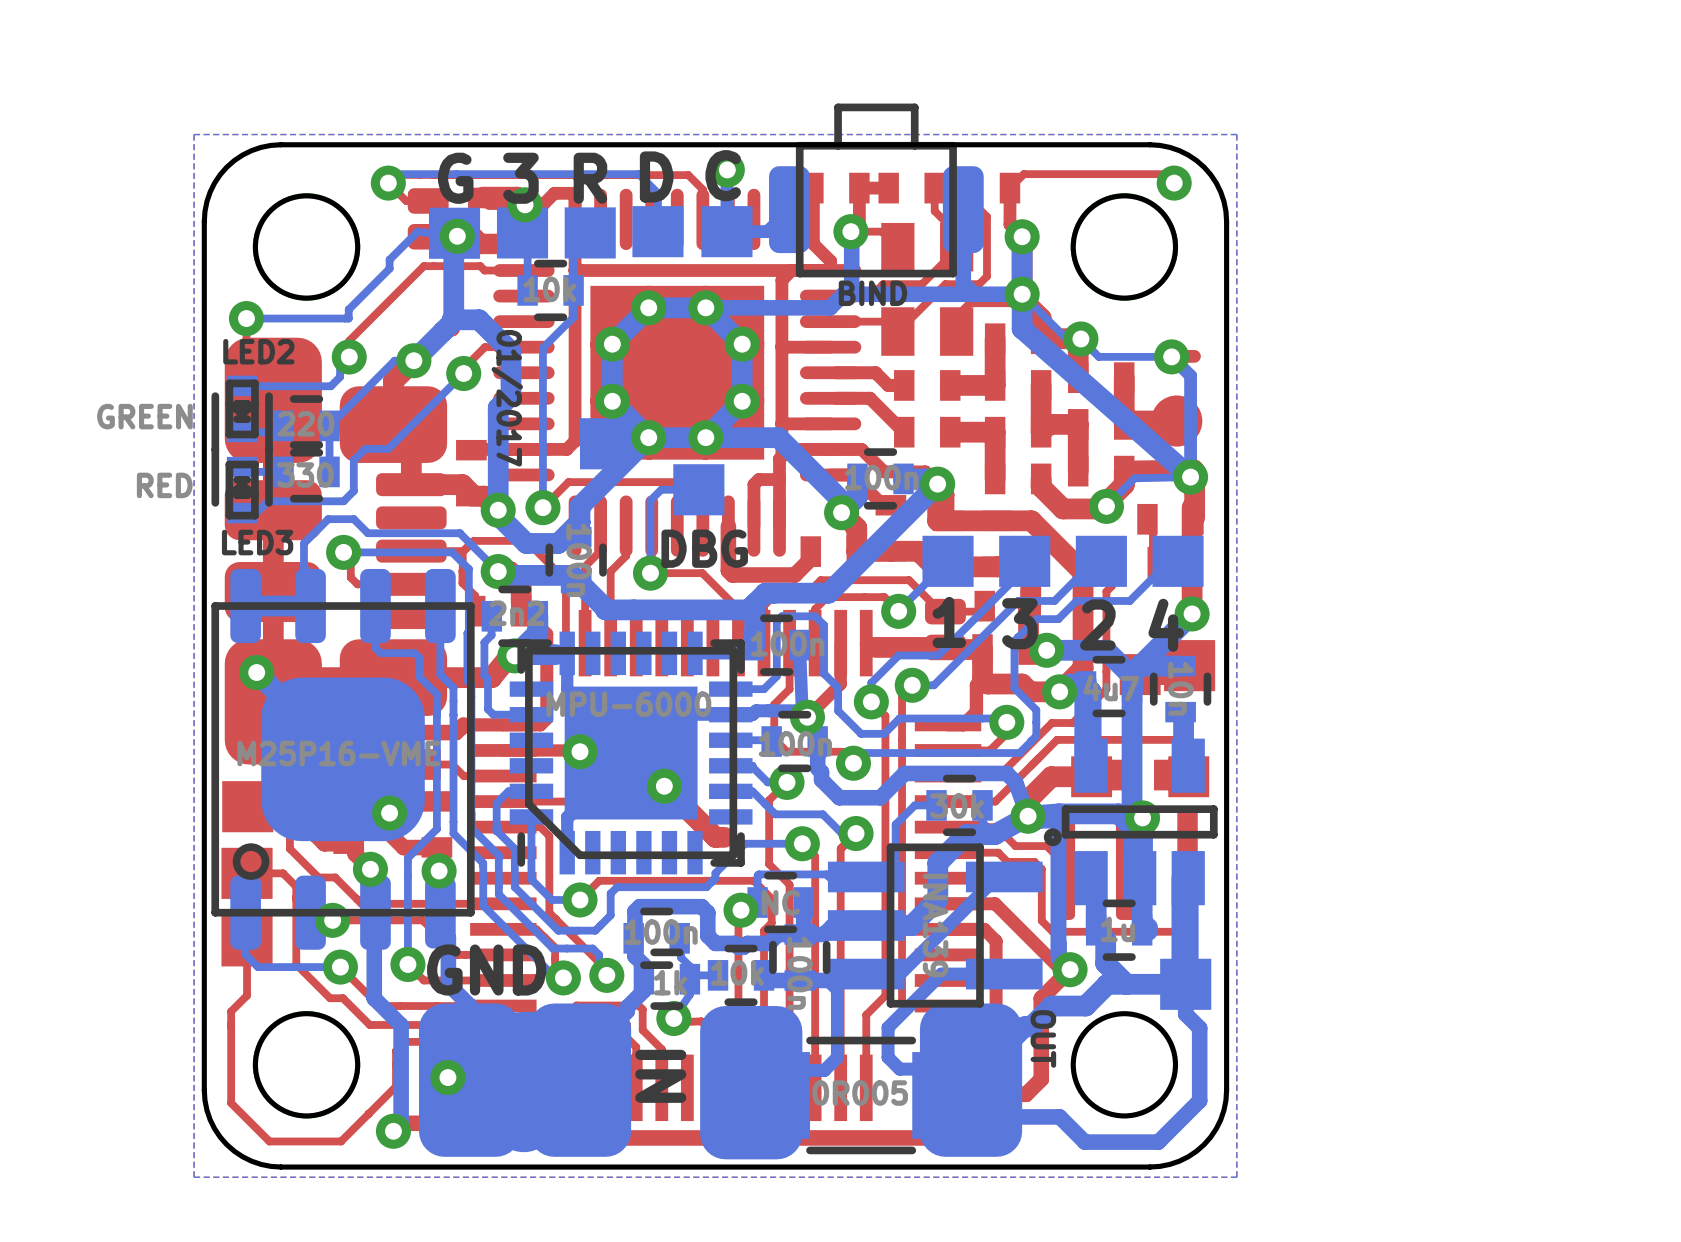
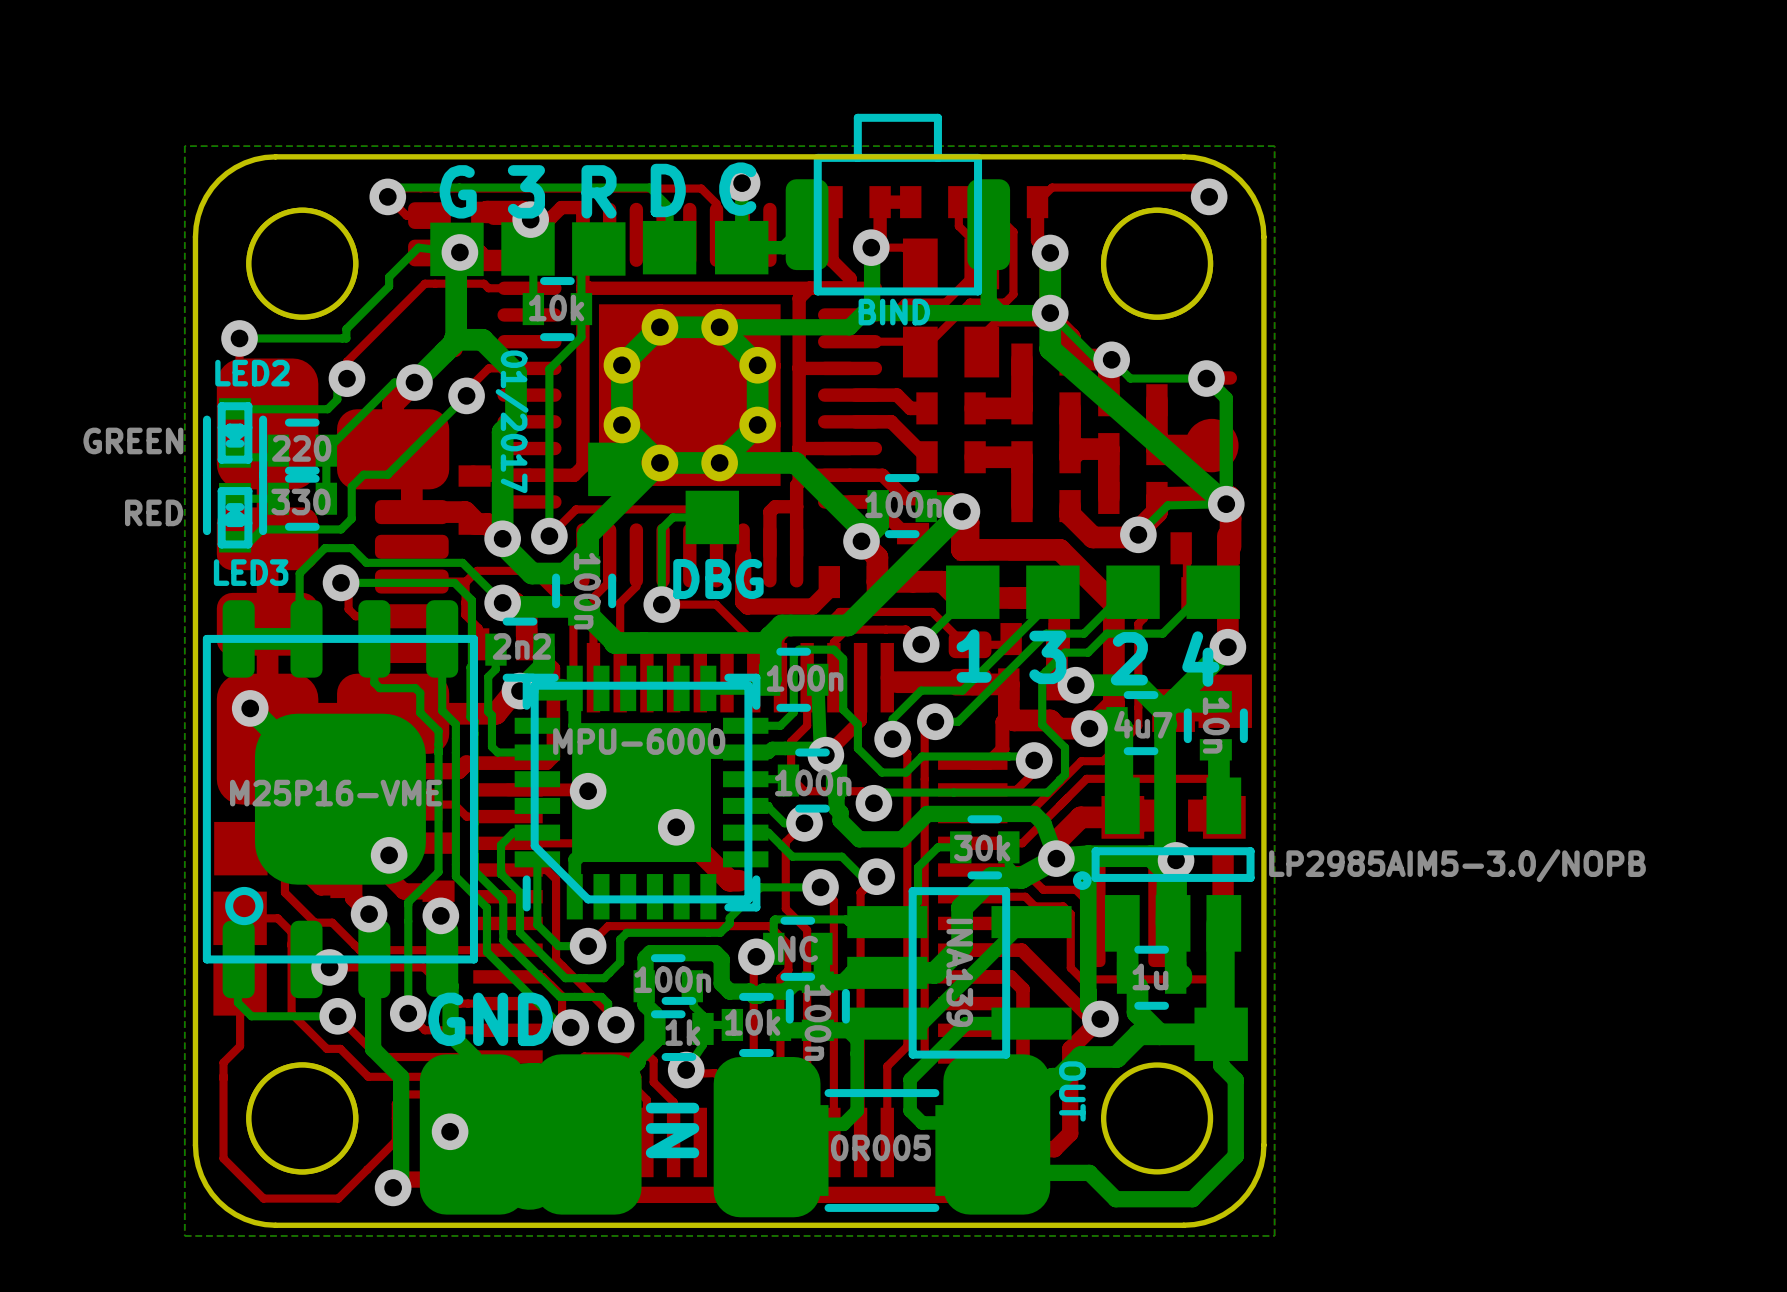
part value: none -> LP2985AIM5-3.0/NOPB (1457, 865)

